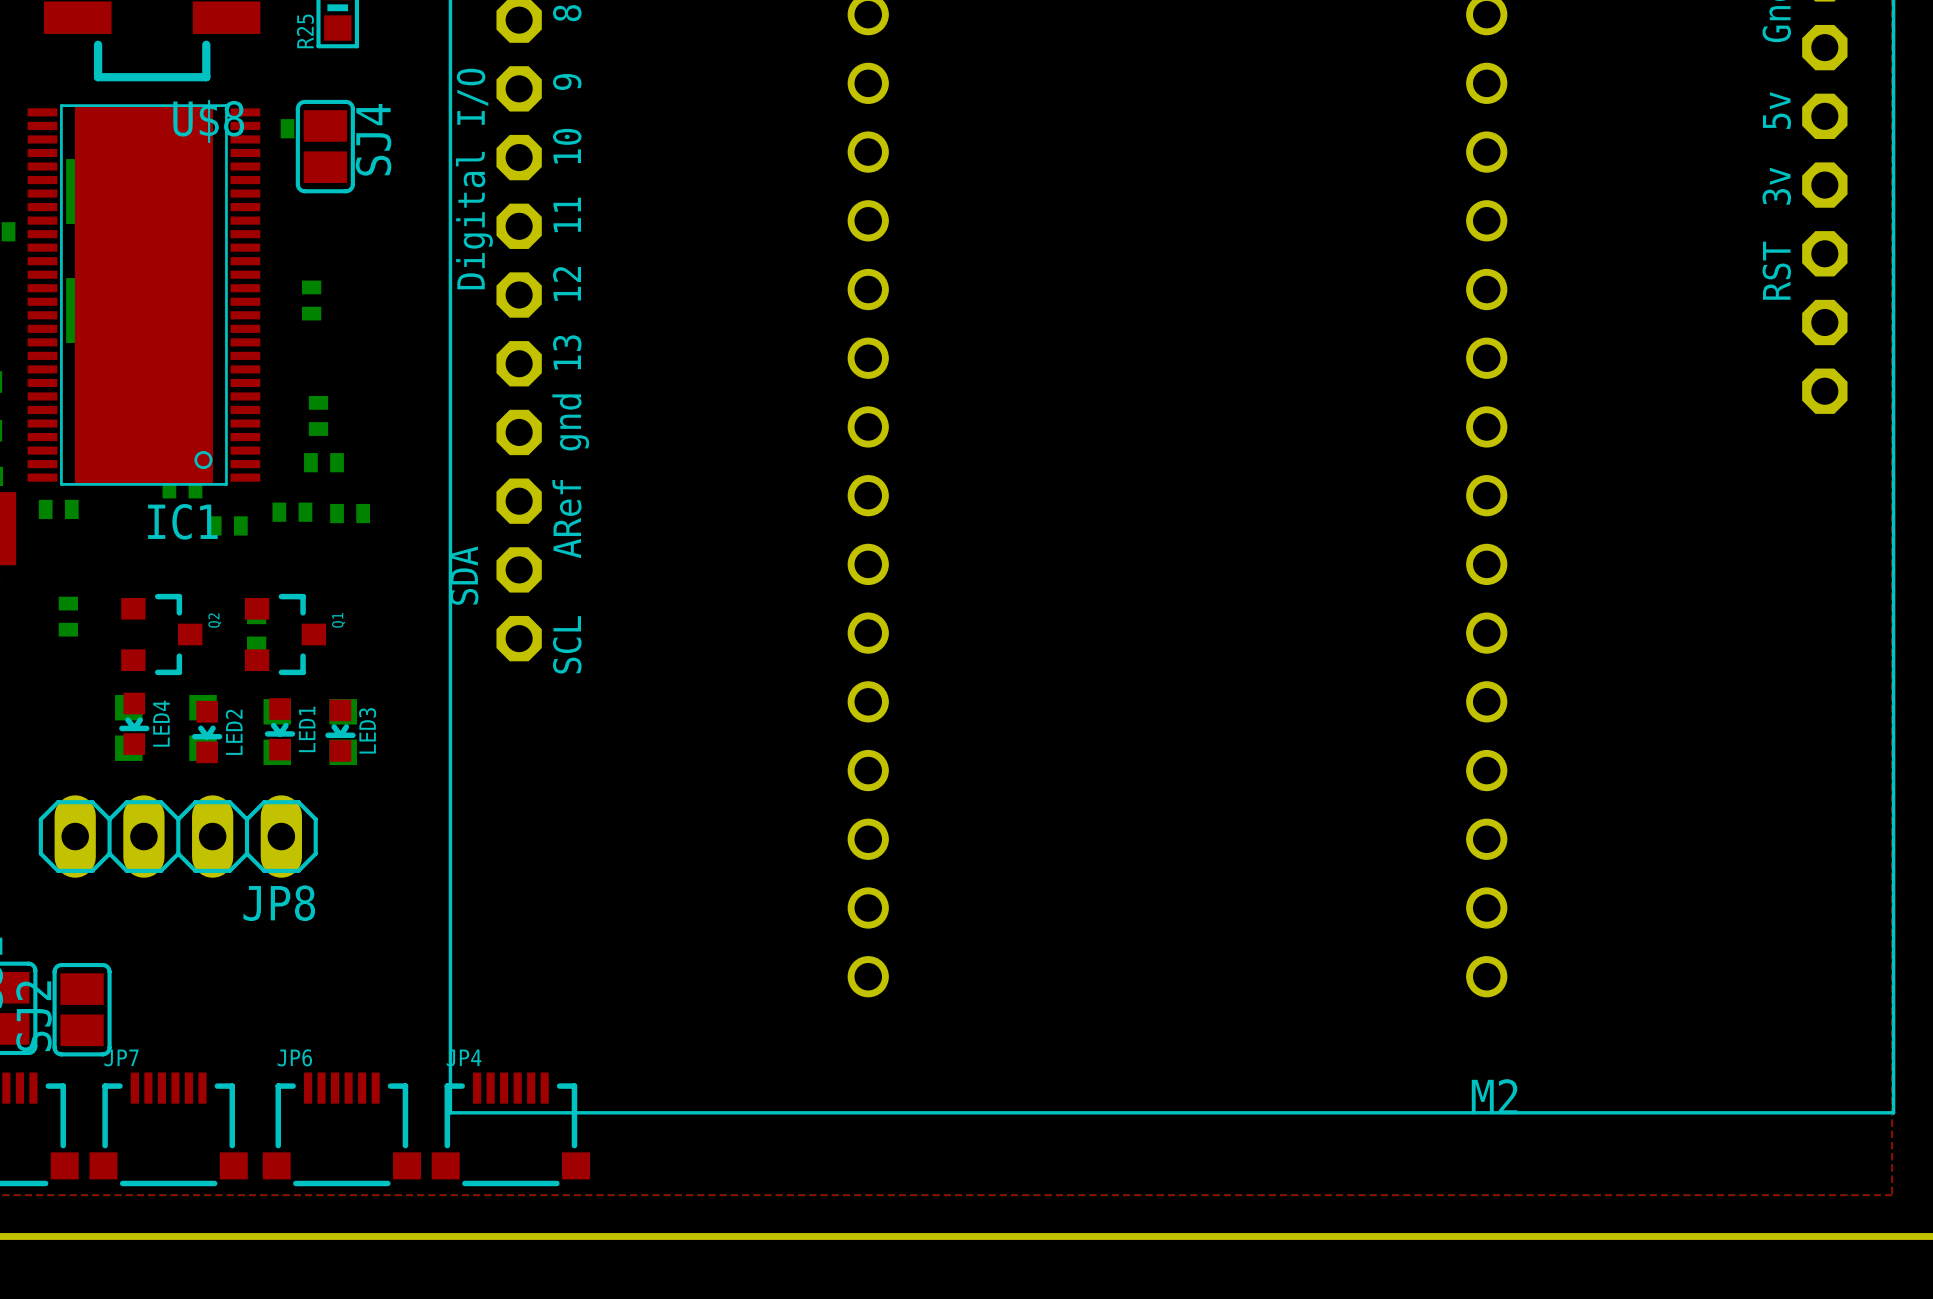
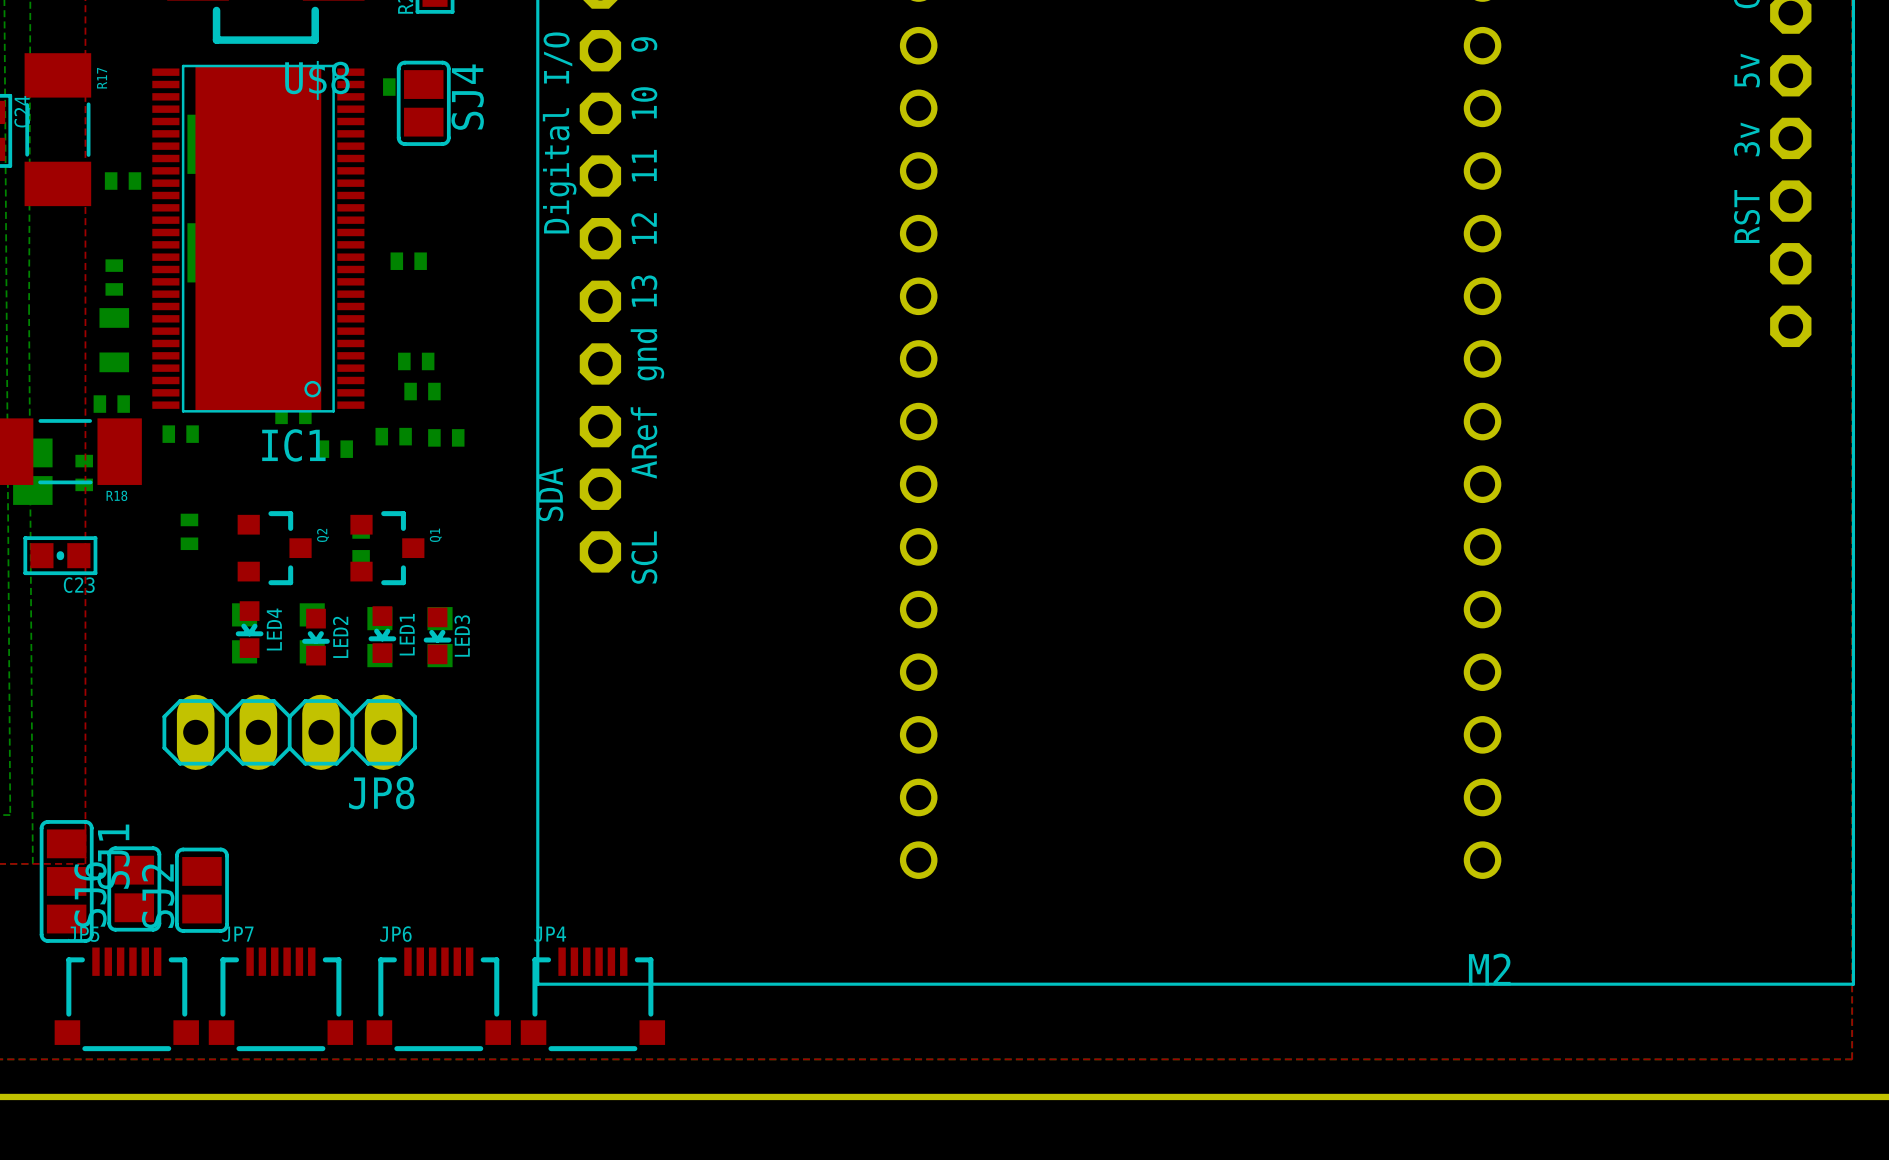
part rotation: 0° (311, 300) -> 90° clockwise (408, 261)
part rotation: 0° (318, 415) -> 90° clockwise (416, 361)

